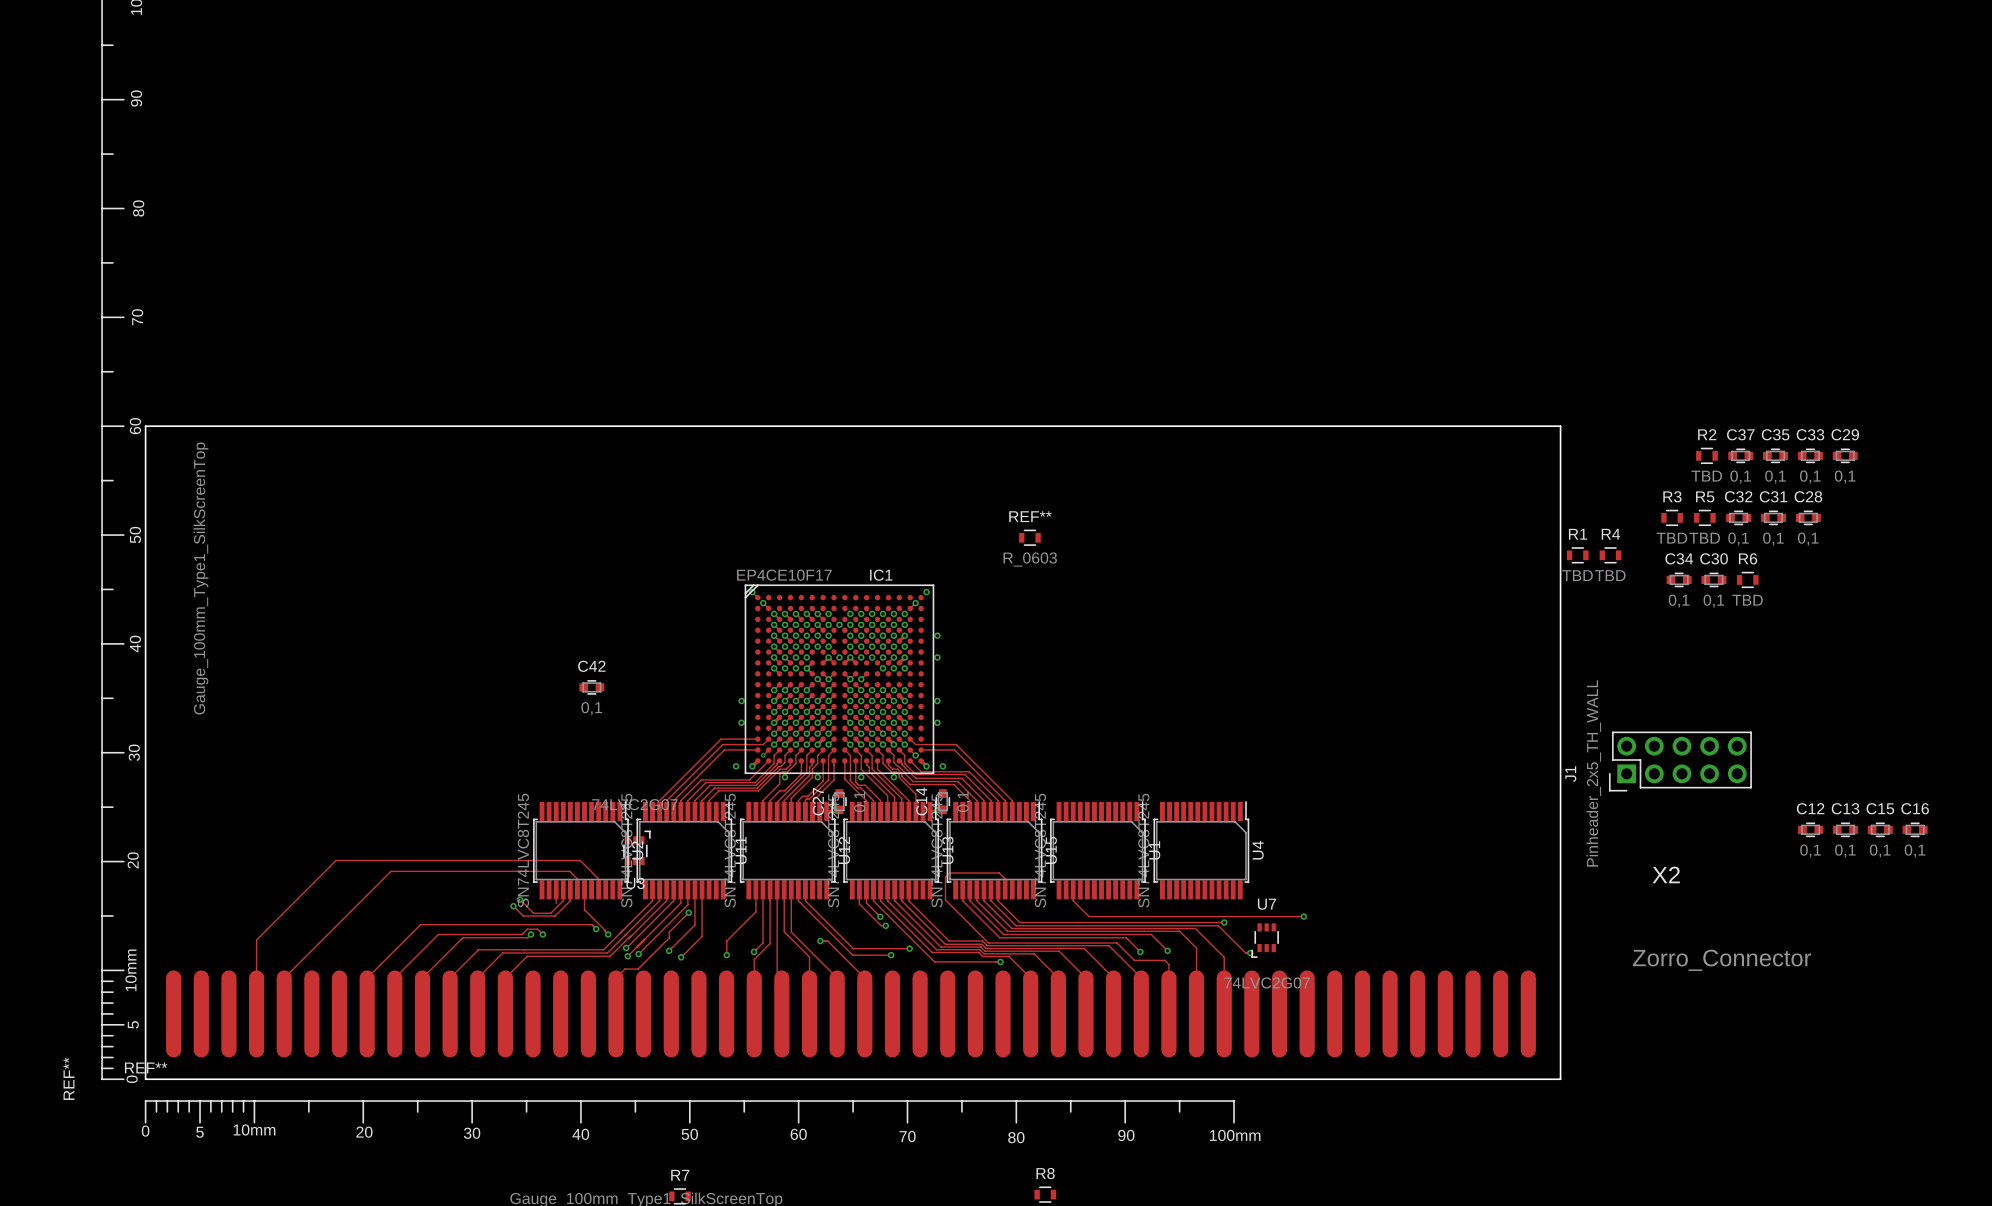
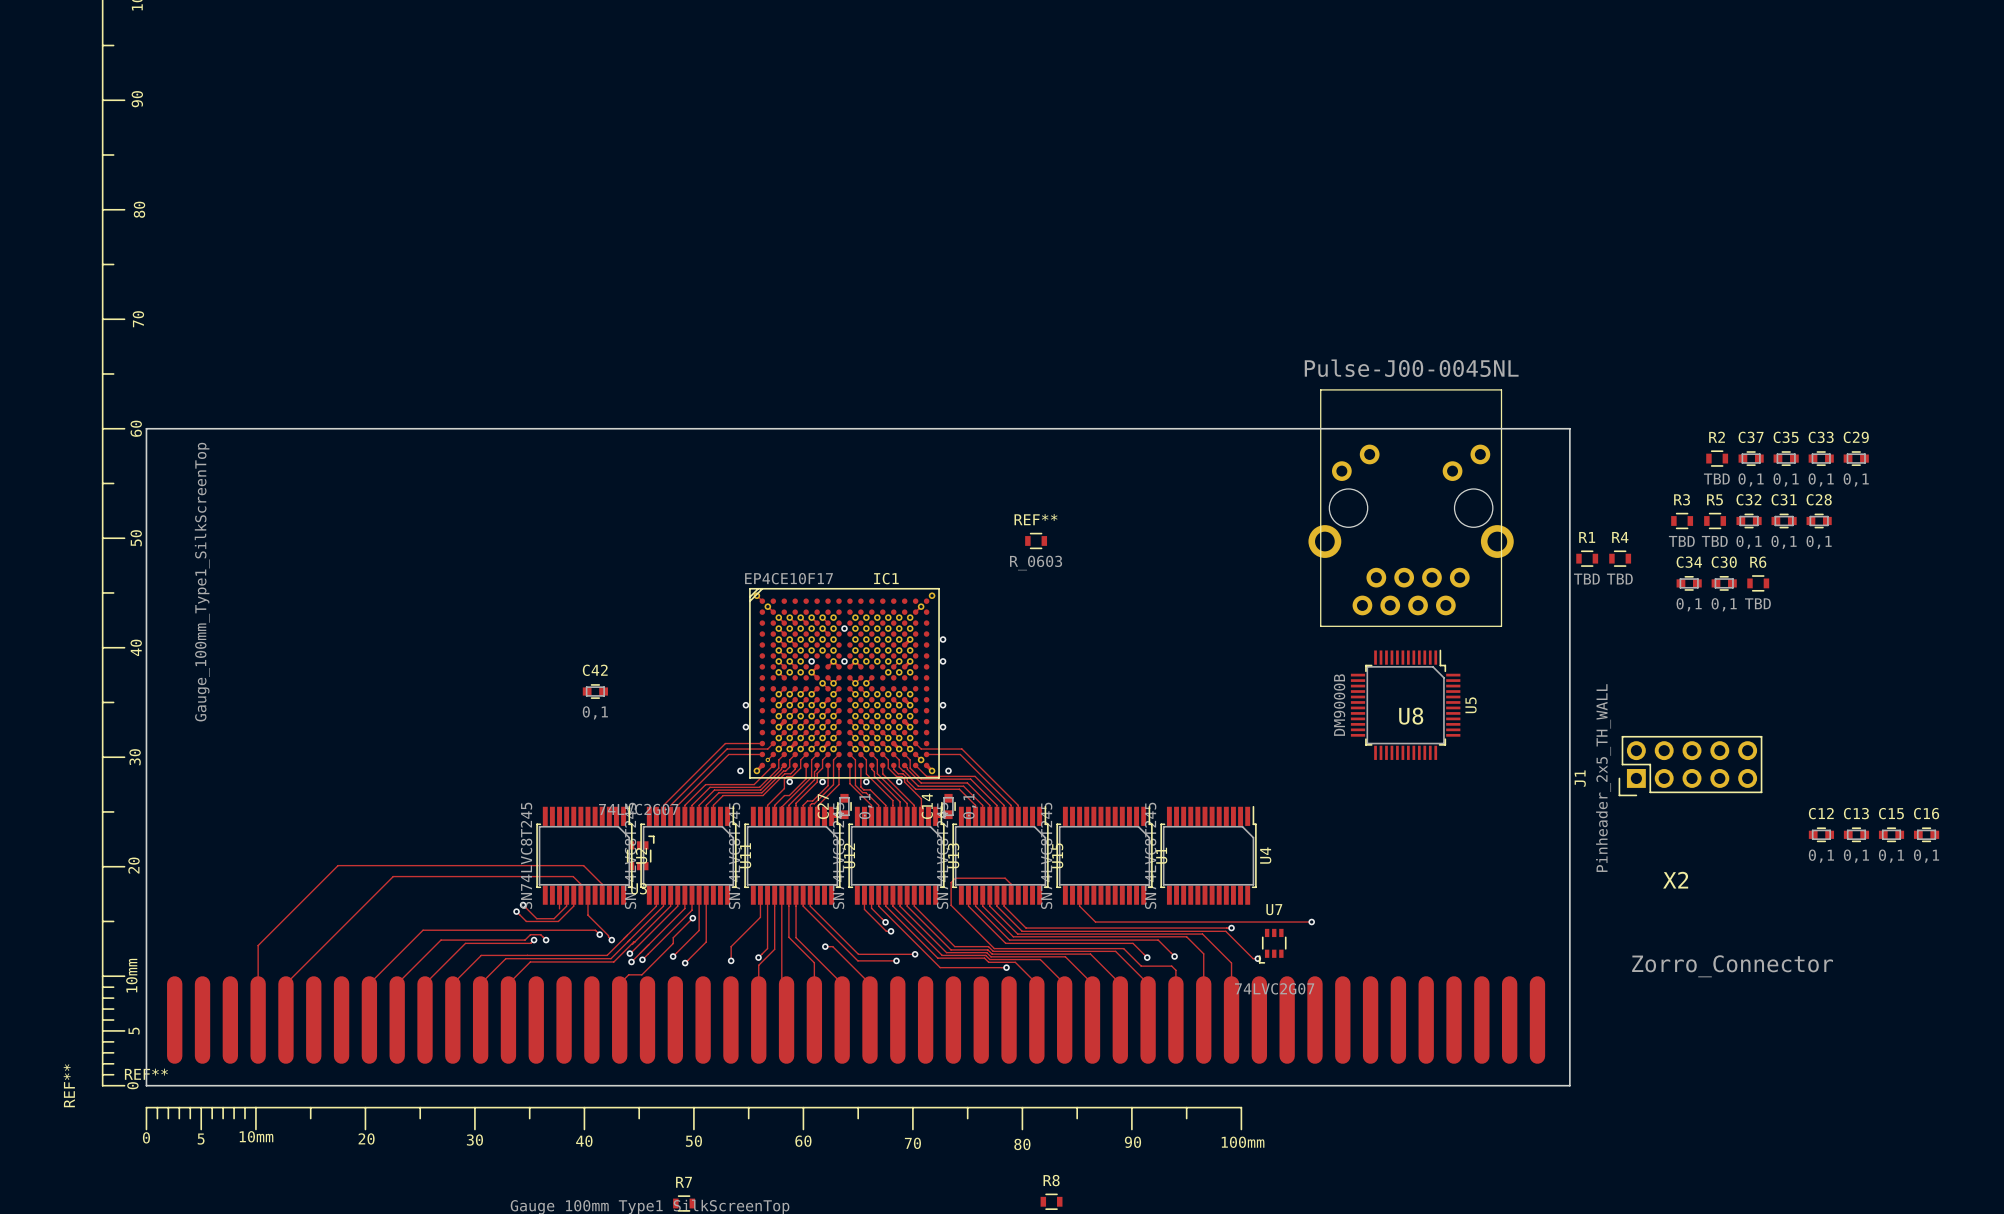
U8: none -> Pulse-J00-0045NL (1411, 508)
U5: none -> DM9000B (1405, 704)

